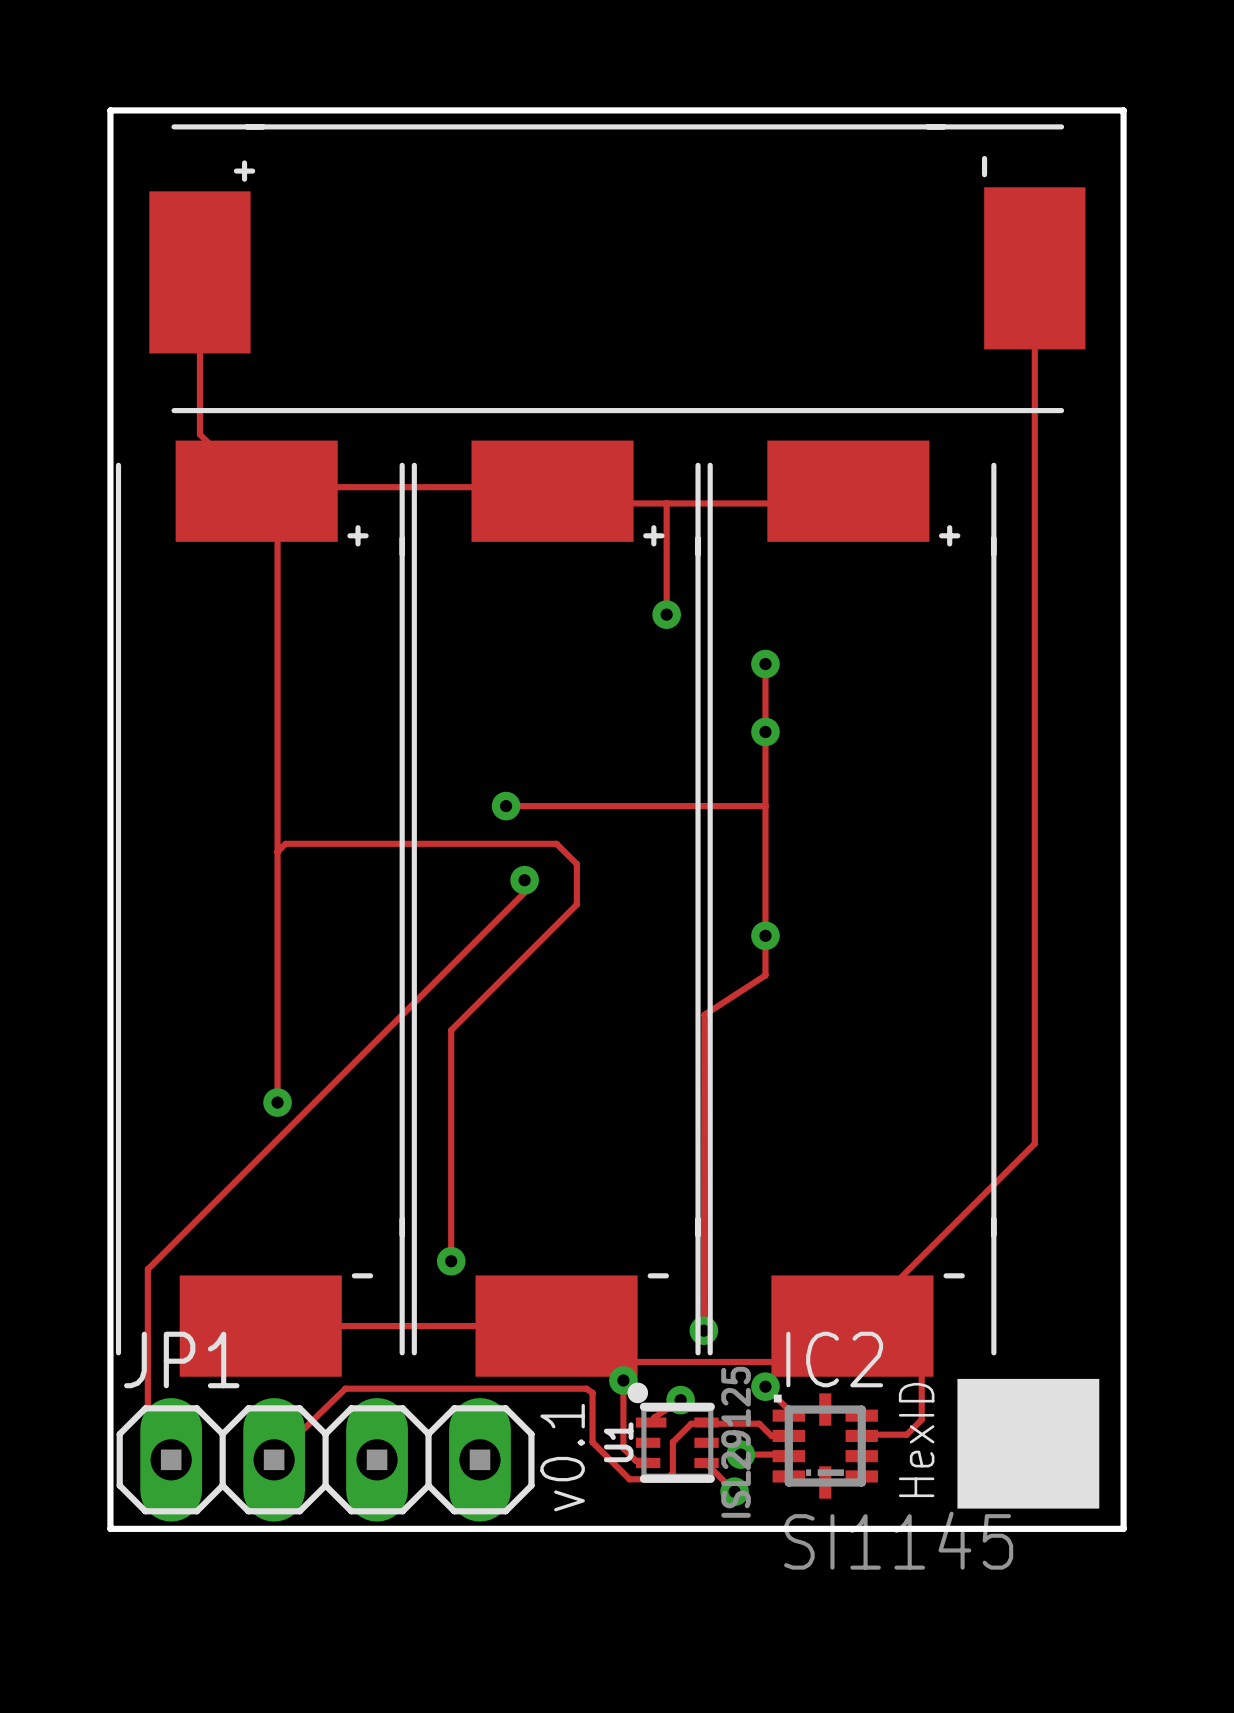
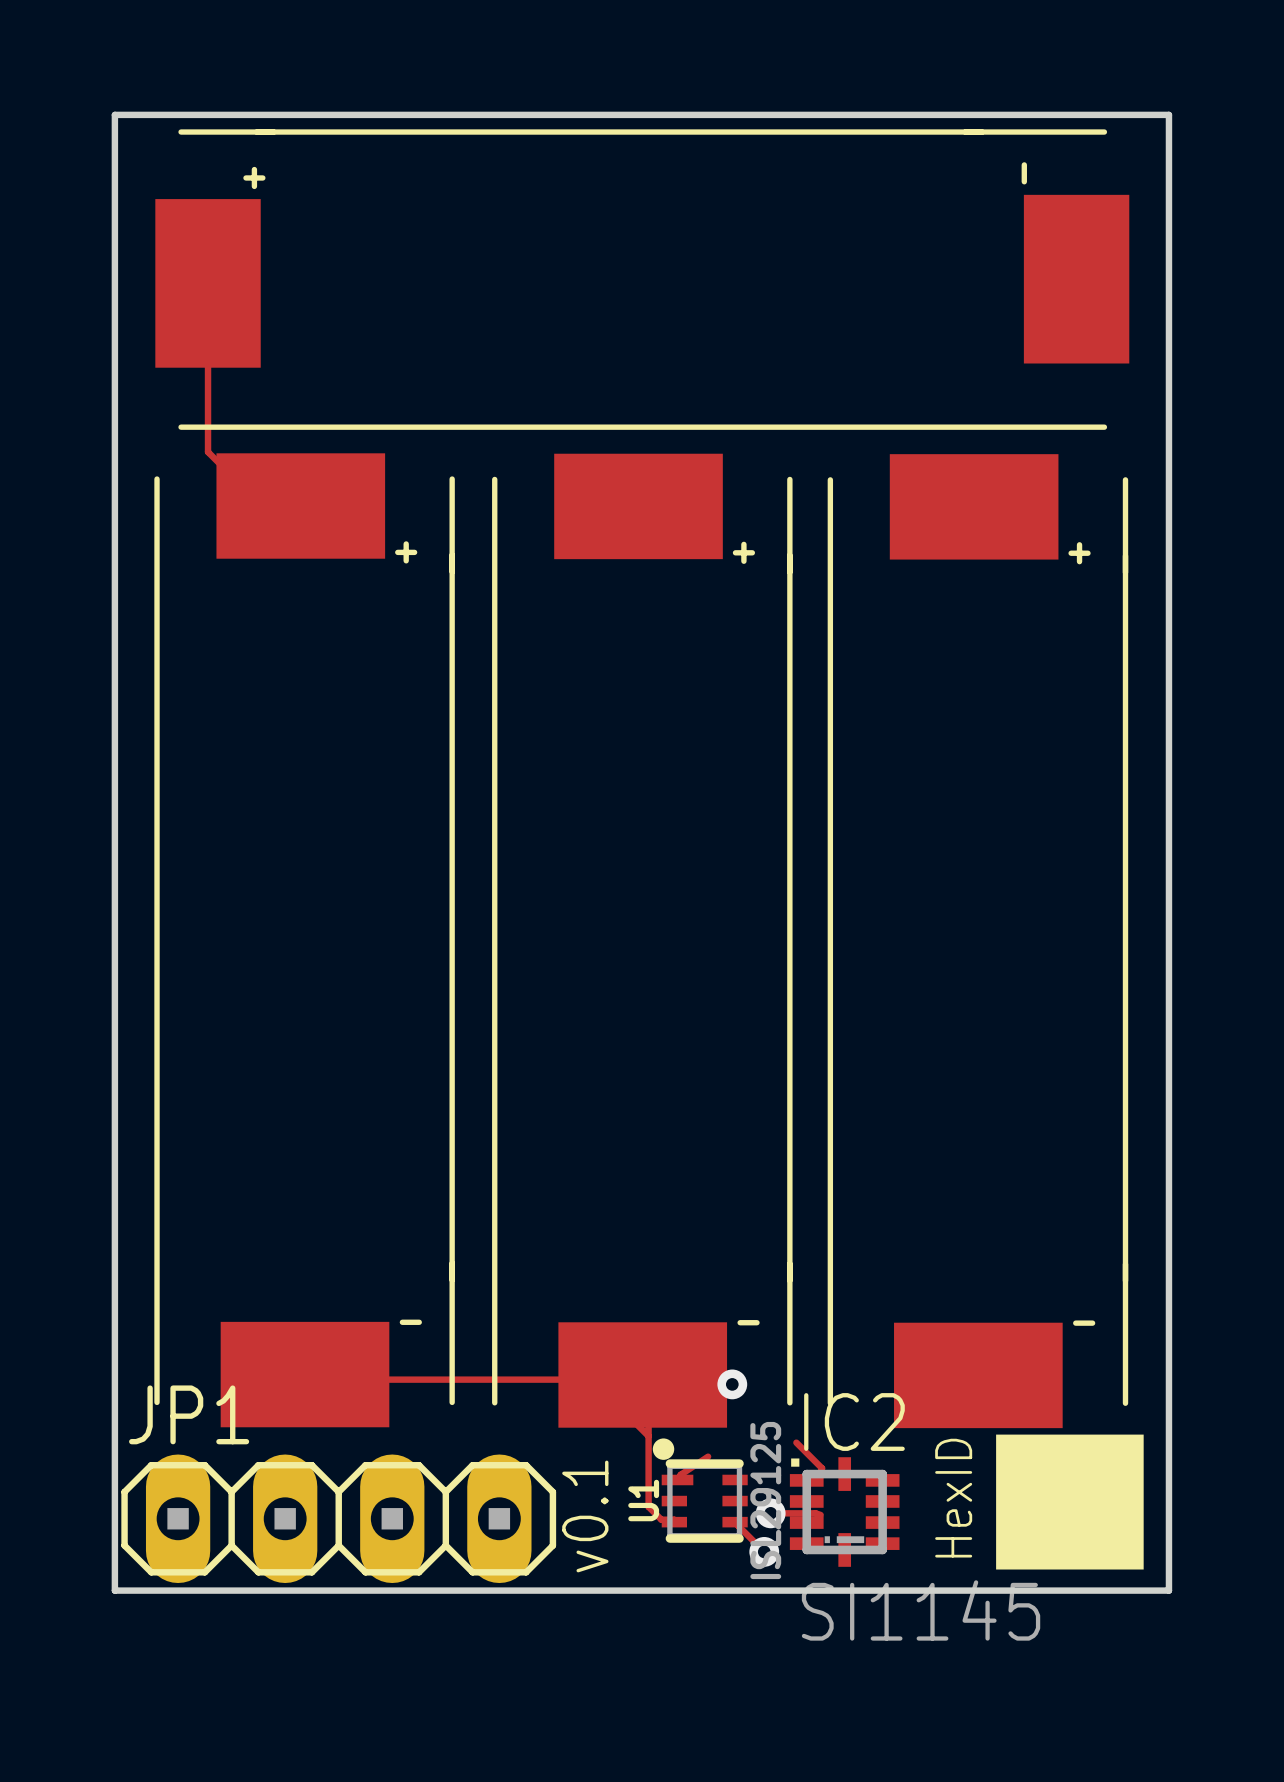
track: (1034, 268) (1034, 1143) (845, 1332) (845, 1361) (623, 1361) -> none
track: (848, 491) (783, 491) (783, 503) (623, 503) (623, 491) (552, 491) (552, 487) (252, 487) (277, 487) (277, 503) (277, 1102) -> none
track: (666, 503) (666, 614) -> none
via: (666, 614) -> none
track: (765, 664) (765, 975) (704, 1014) (703, 1330) -> none
via: (765, 664) -> none
via: (765, 731) -> none
track: (506, 806) (765, 806) -> none
via: (506, 806) -> none
track: (277, 851) (285, 843) (556, 843) (576, 864) (576, 904) (451, 1030) (451, 1261) -> none
track: (524, 880) (524, 892) (147, 1269) (147, 1436) (171, 1459) -> none
via: (524, 880) -> none
part position: (260, 908) -> (304, 940)
part position: (556, 908) -> (642, 940)
part position: (852, 908) -> (977, 941)
via: (765, 935) -> none
via: (277, 1102) -> none
via: (451, 1261) -> none
track: (852, 1326) (872, 1346) (893, 1346) (921, 1374) (921, 1419) (906, 1434) (861, 1435) -> none
via: (623, 1380) -> none
via: (765, 1386) -> none
via: (680, 1400) -> none
track: (788, 1435) (771, 1436) (759, 1423) (691, 1423) (672, 1442) (672, 1473) (666, 1479) (629, 1479) (592, 1442) (592, 1392) (586, 1388) (345, 1388) (274, 1459) -> none
IC2 position: (825, 1446) -> (844, 1512)

